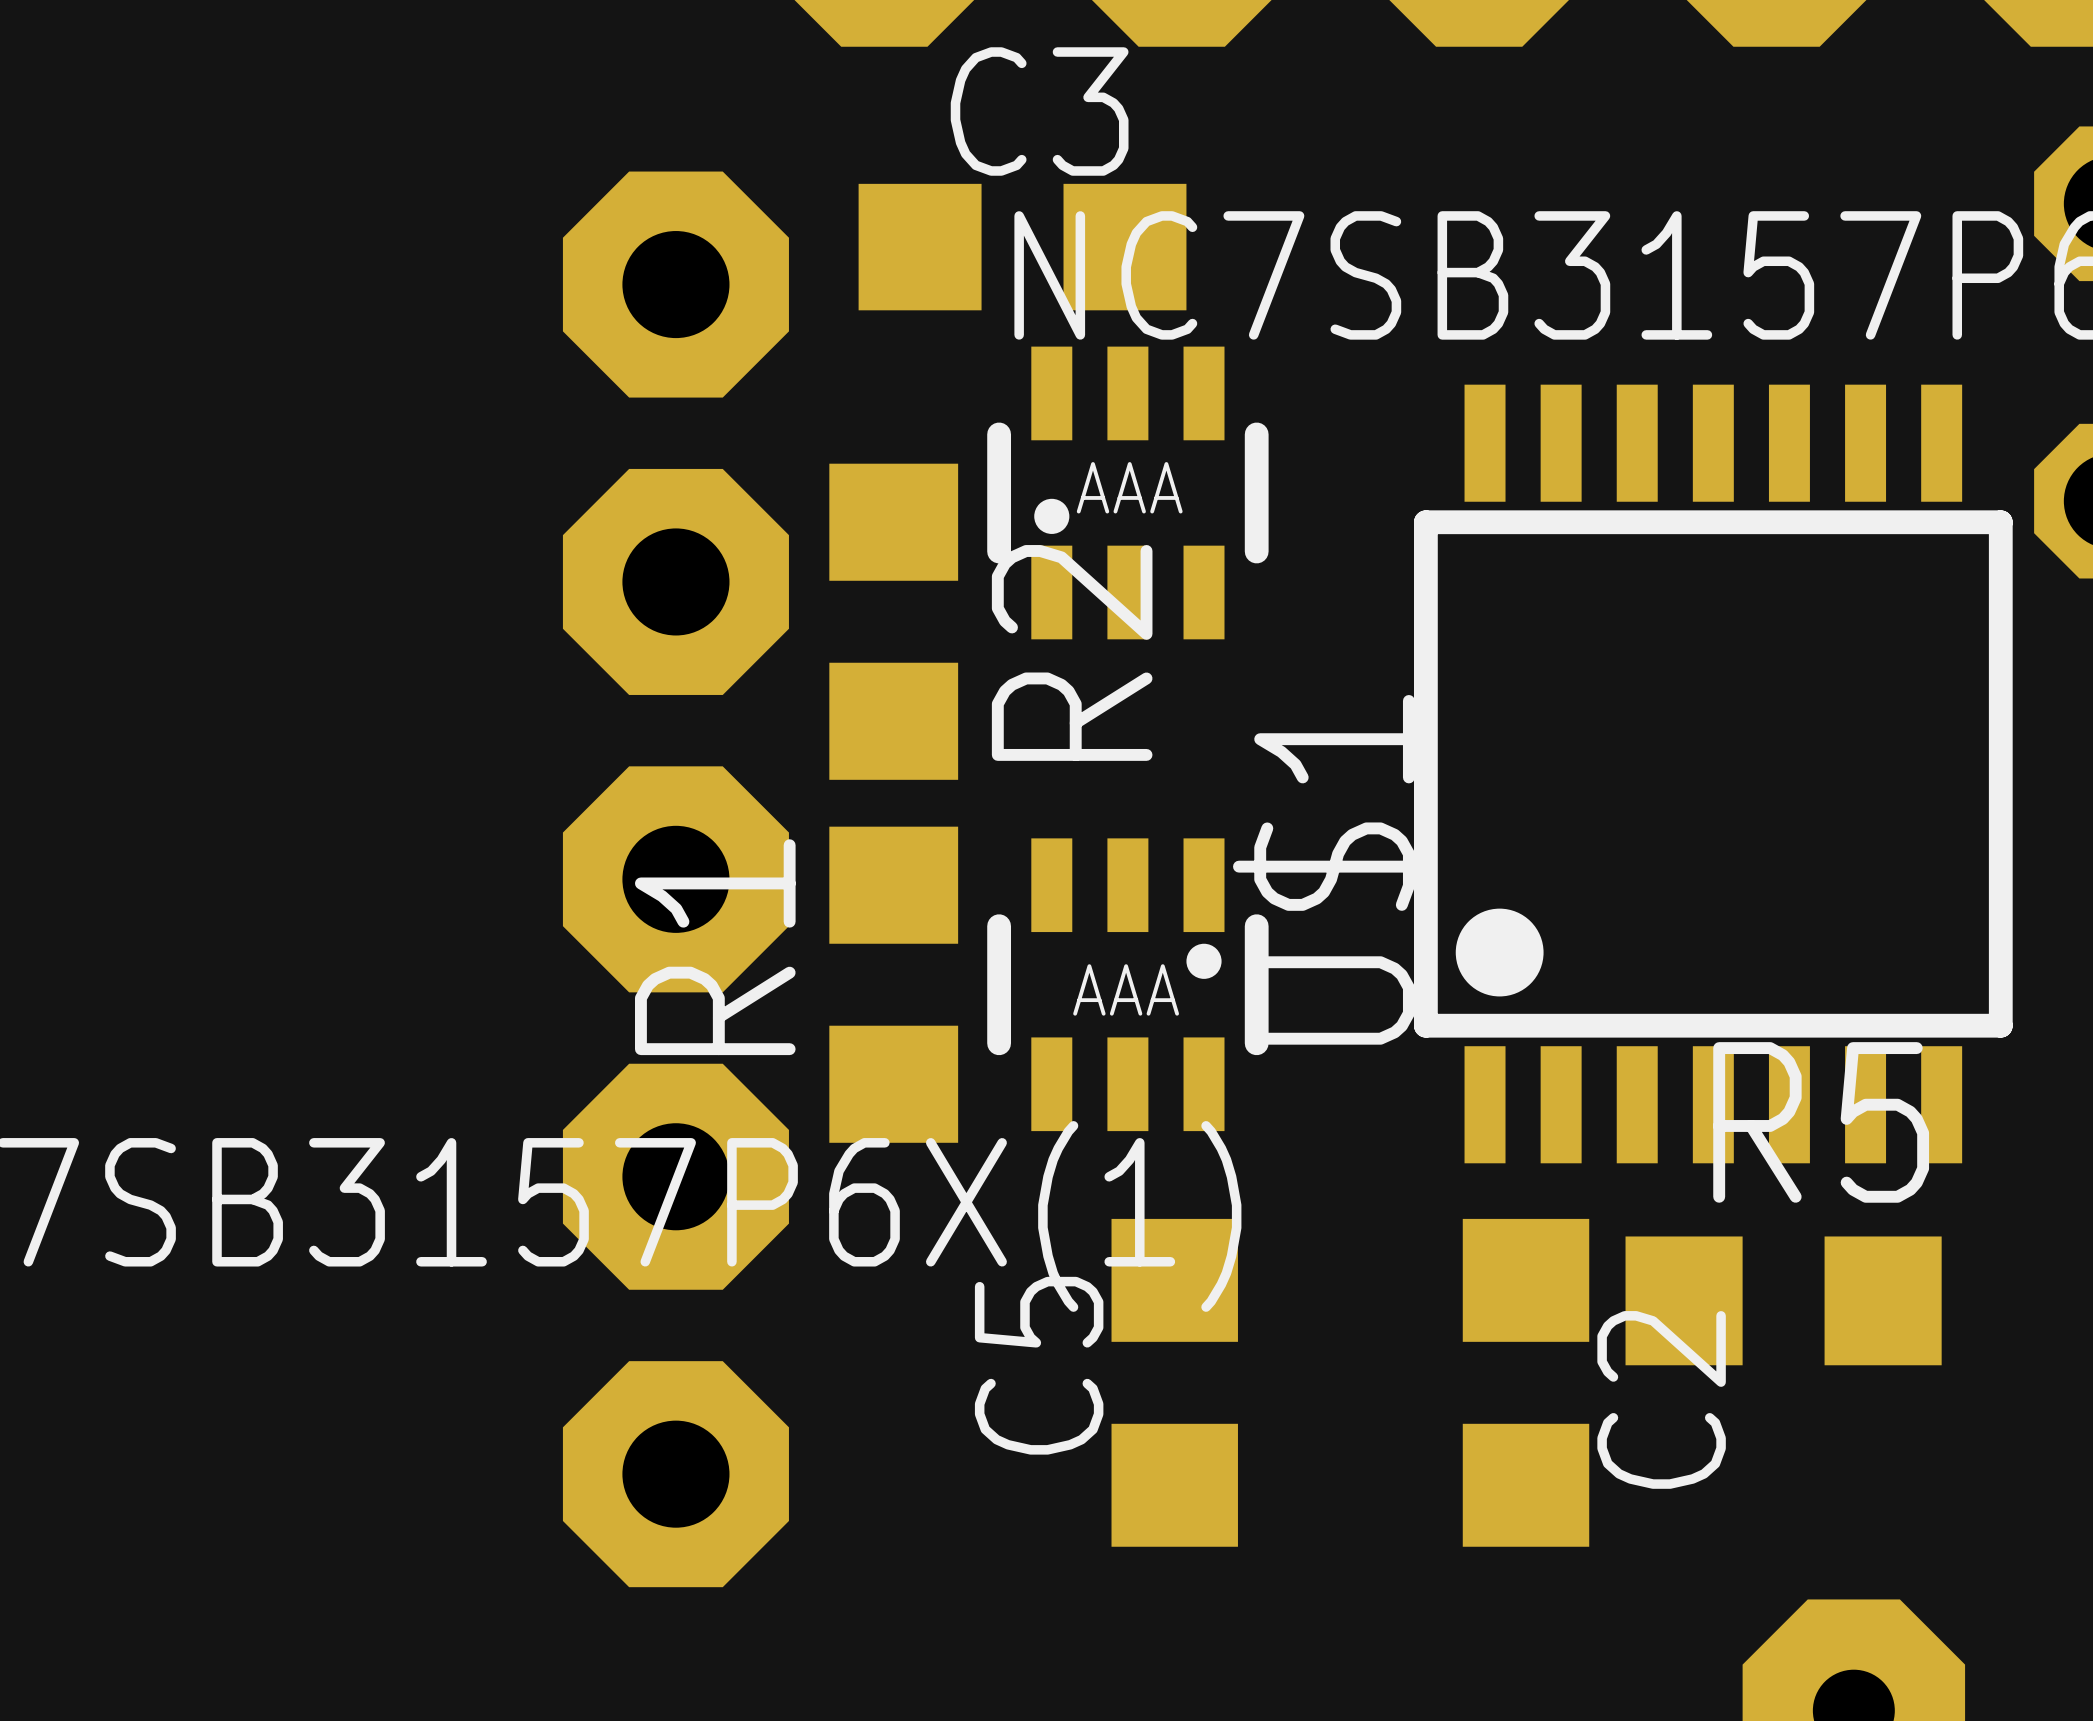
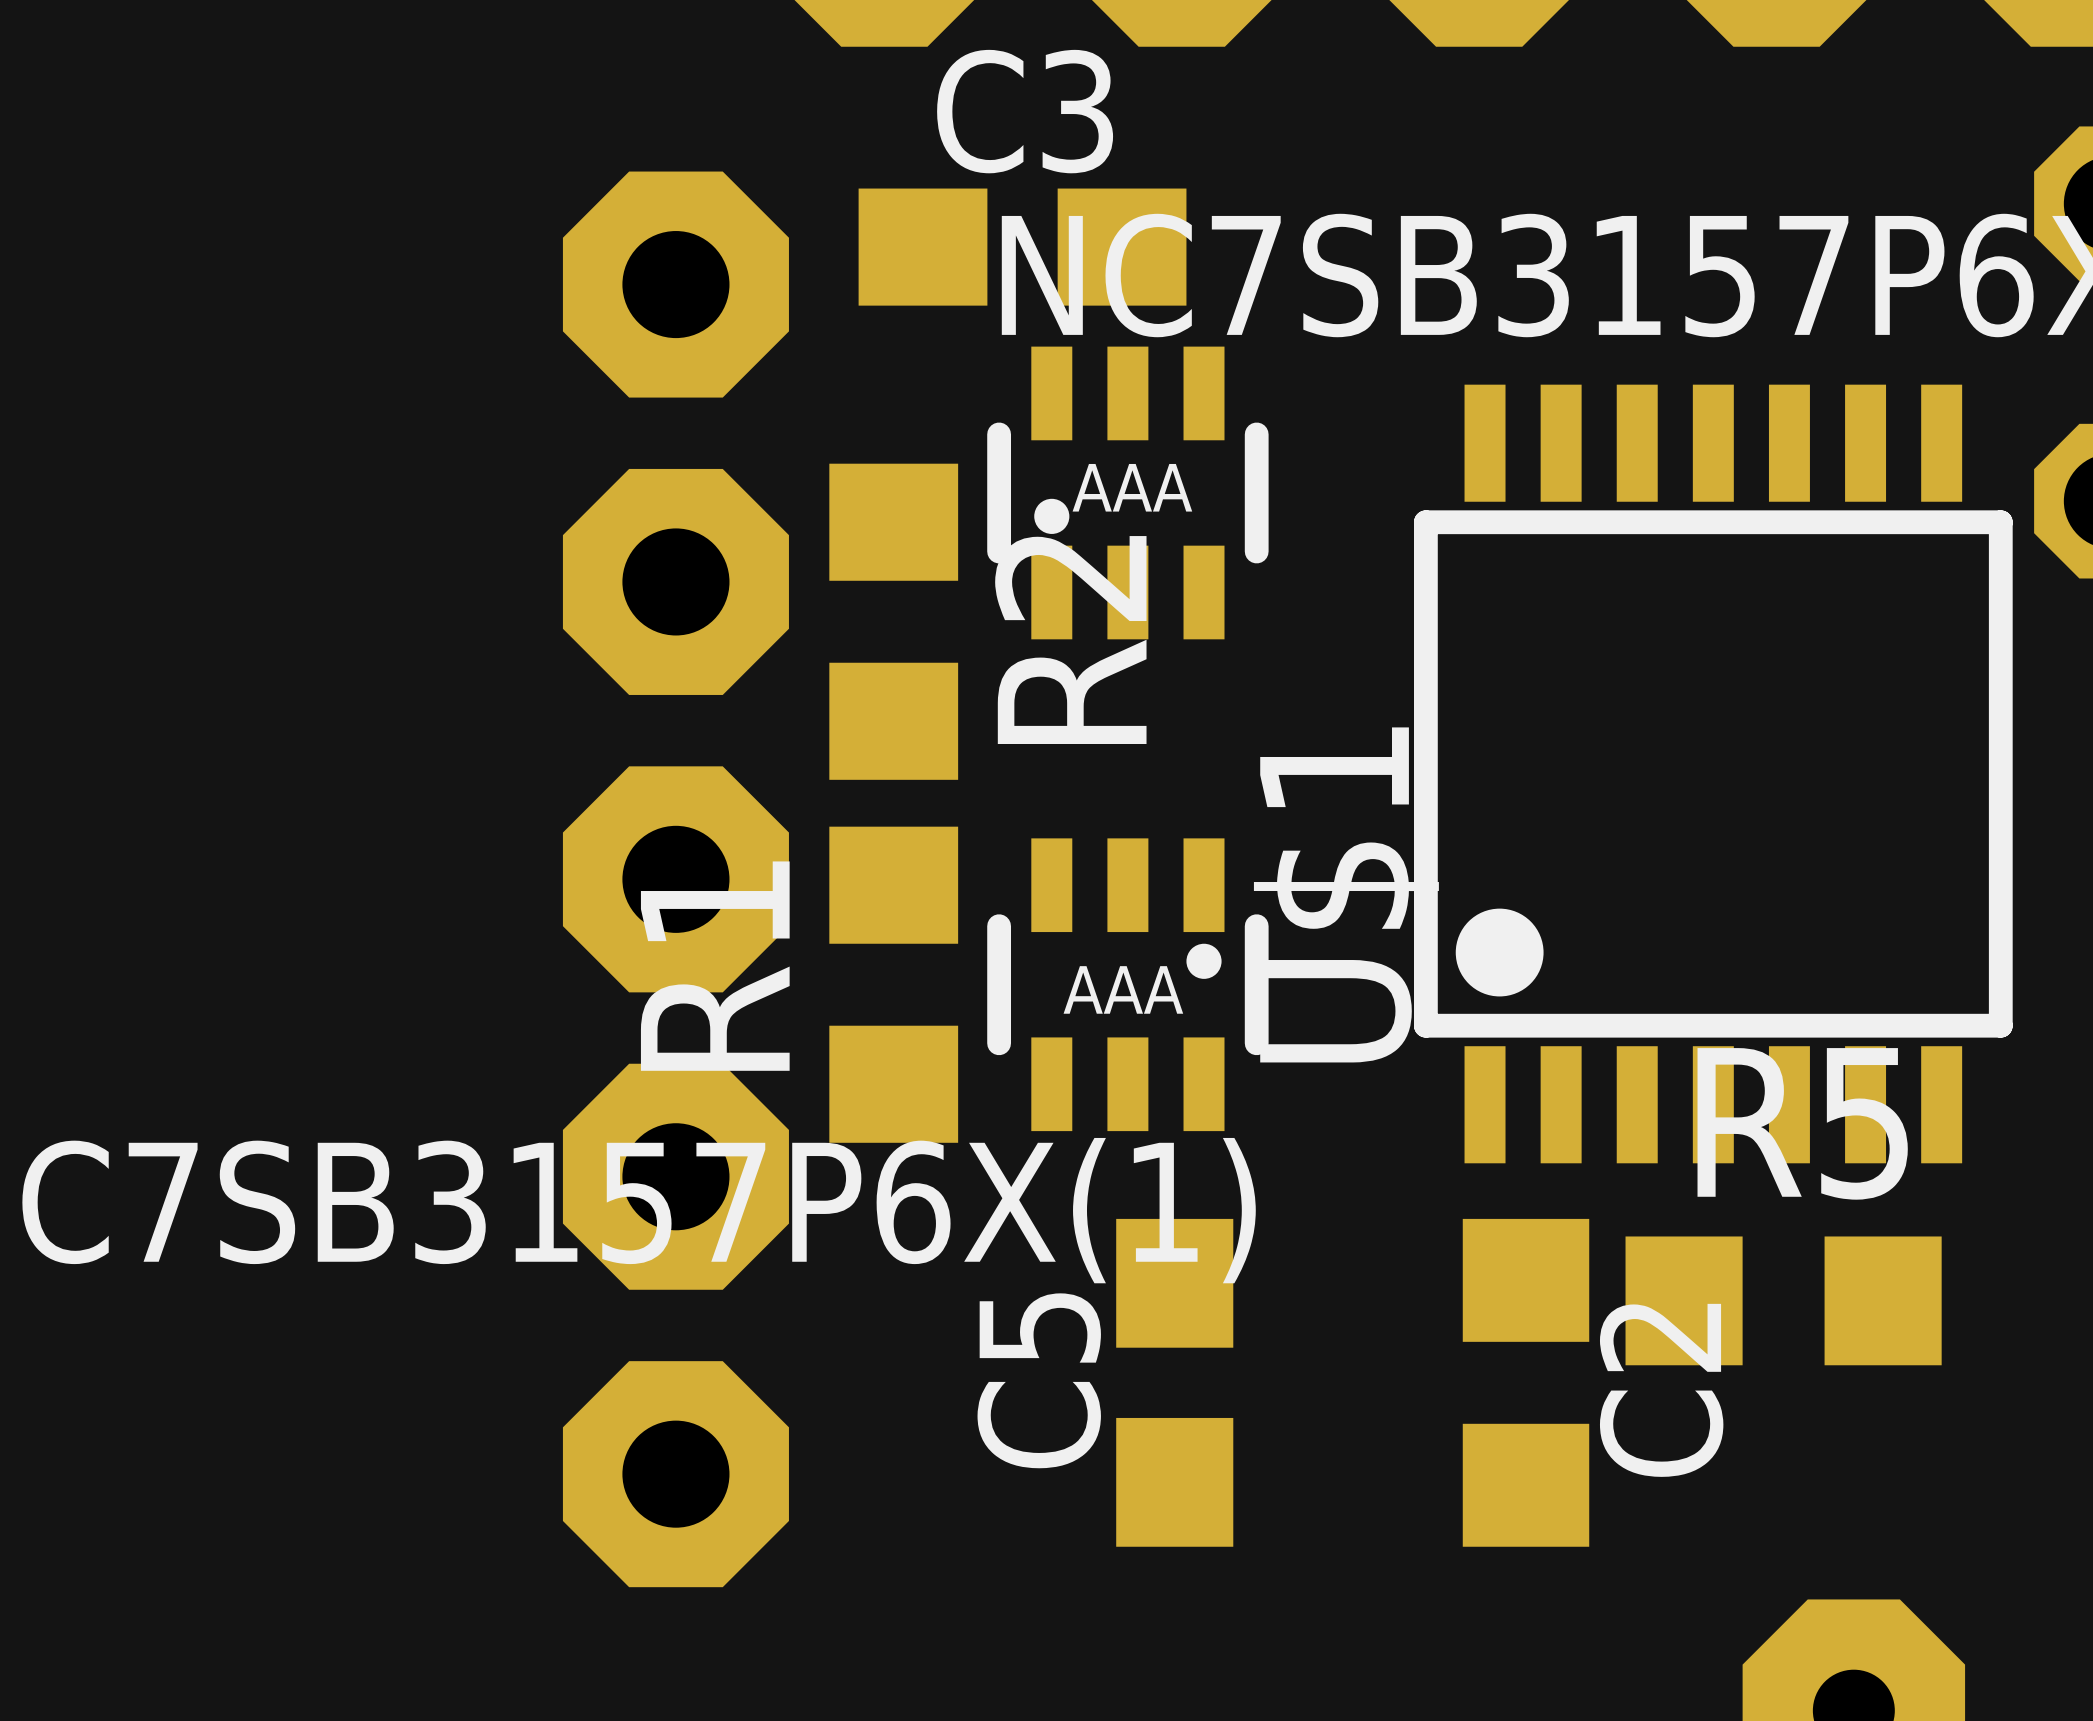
C3 footprint: [858, 183, 1187, 311] -> [858, 188, 1187, 306]
C5 footprint: [1111, 1218, 1238, 1547] -> [1116, 1218, 1234, 1547]

